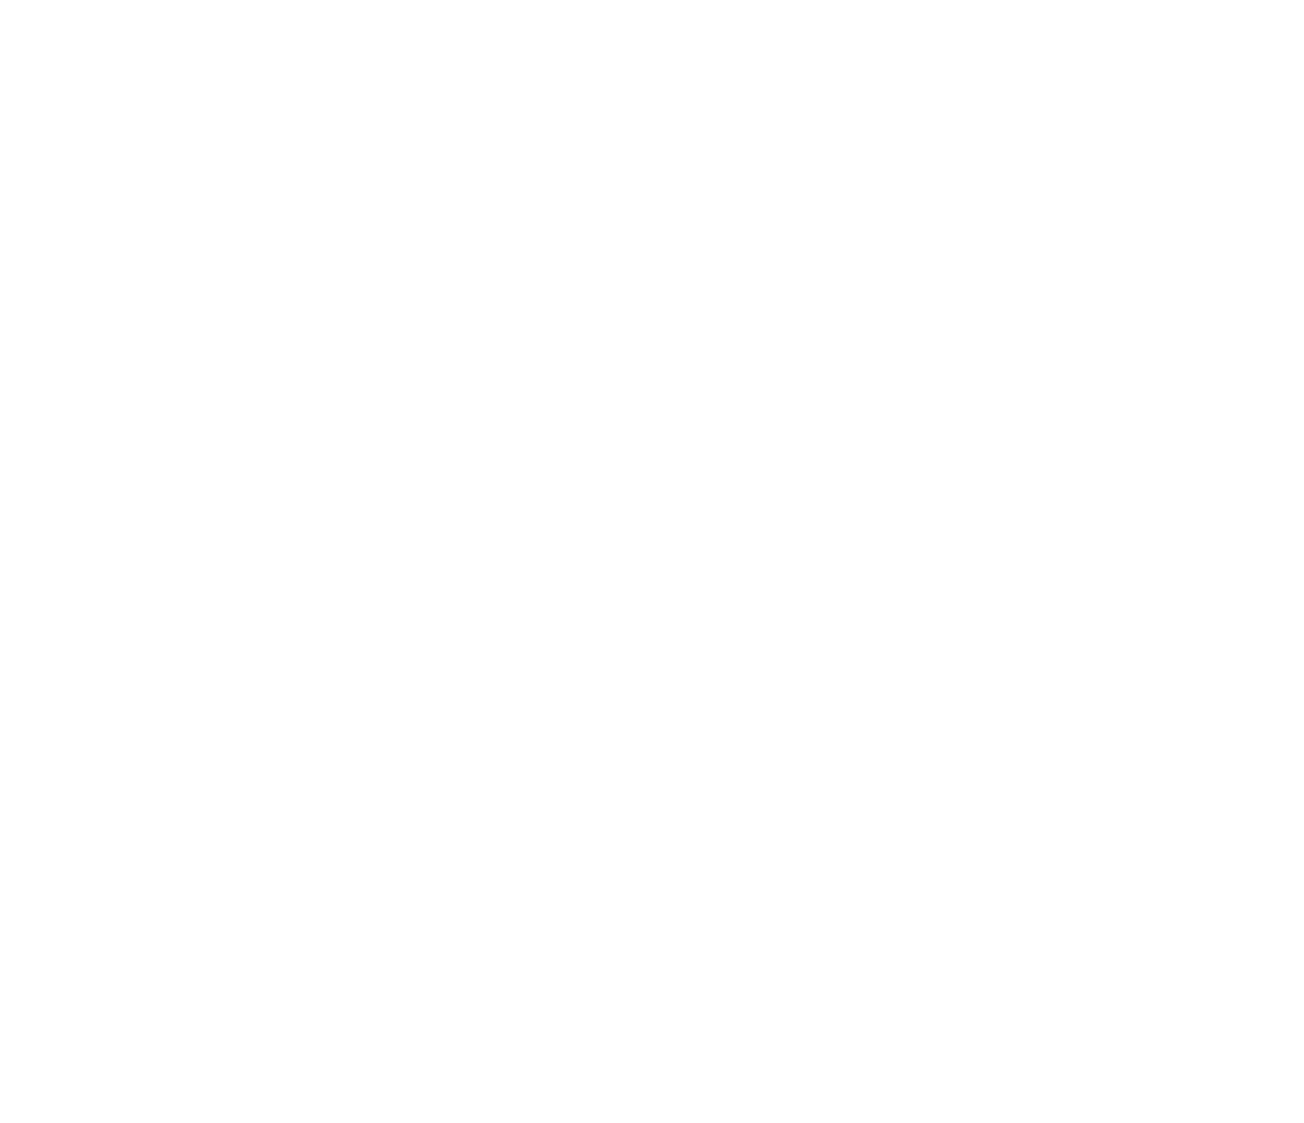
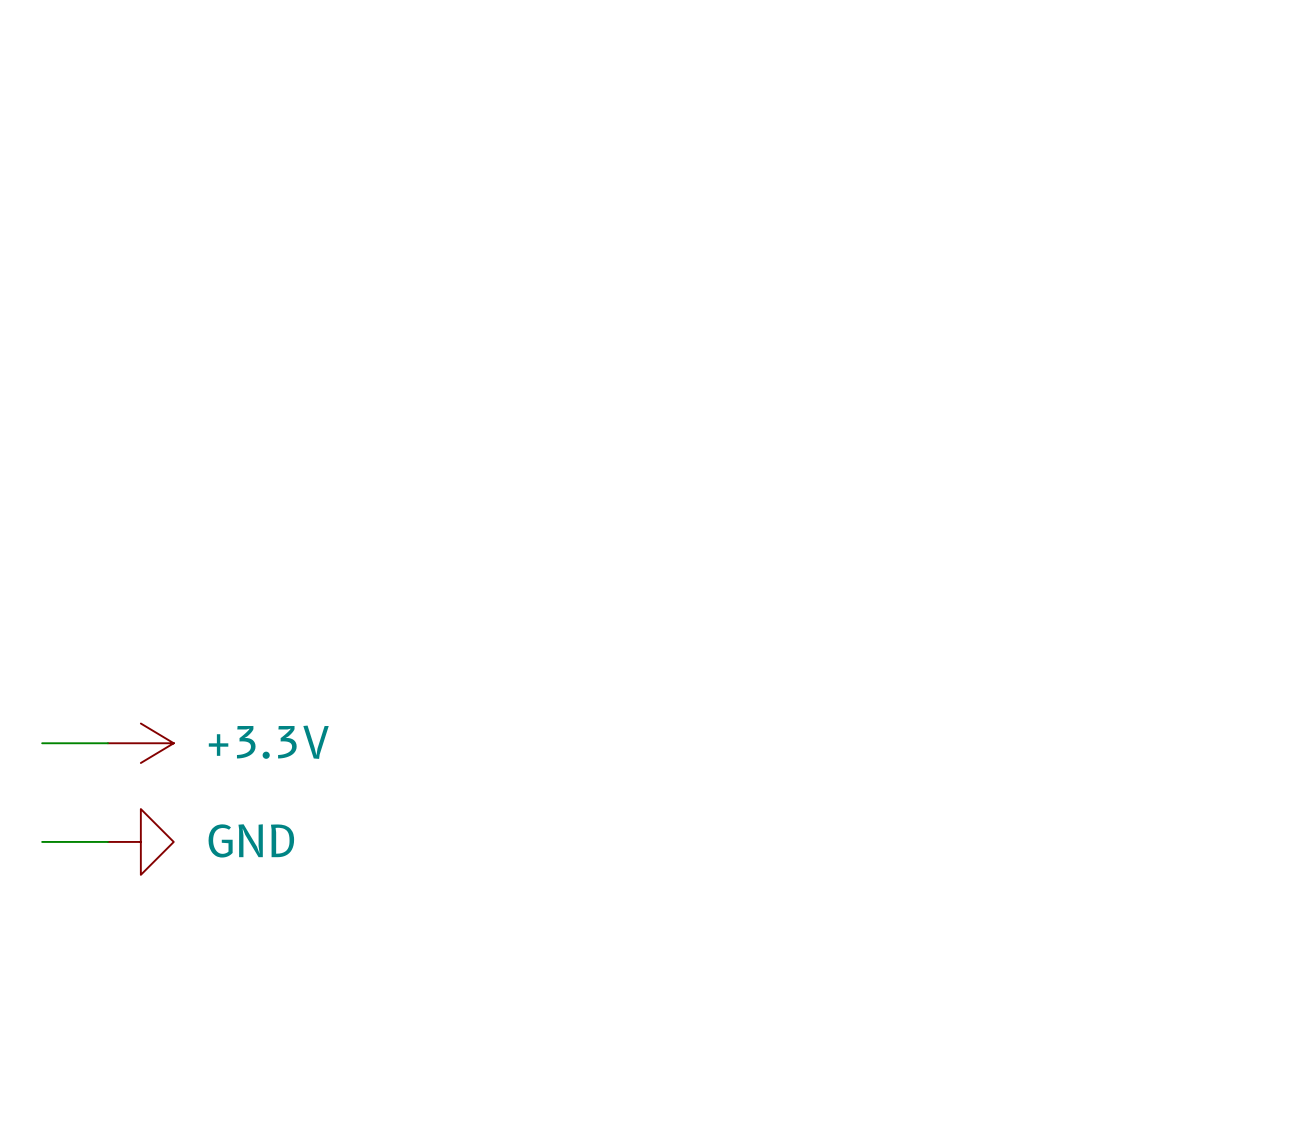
wire: none -> (42, 743) (107, 743)
power symbol: none -> +3.3V (140, 743)
wire: none -> (42, 841) (107, 841)
power symbol: none -> GND (140, 841)

